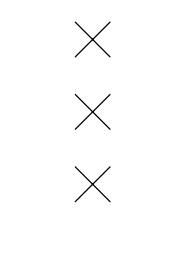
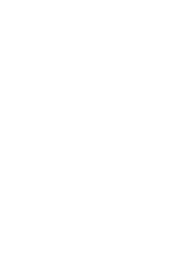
no-connect mark: (92, 39) -> none
no-connect mark: (92, 111) -> none
no-connect mark: (92, 184) -> none

